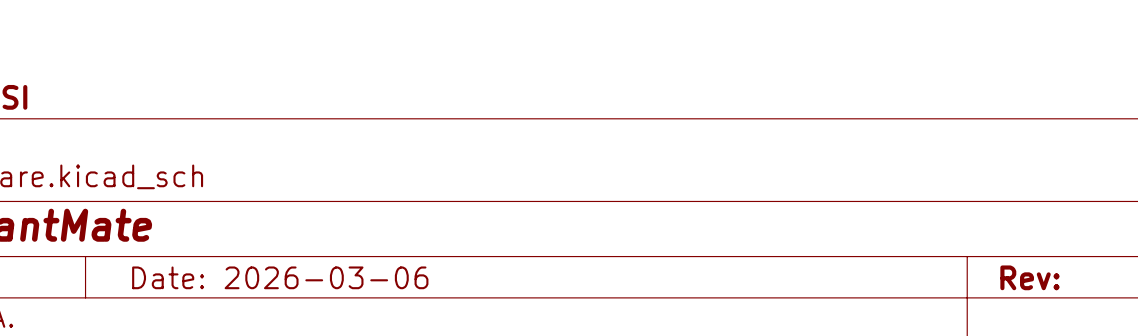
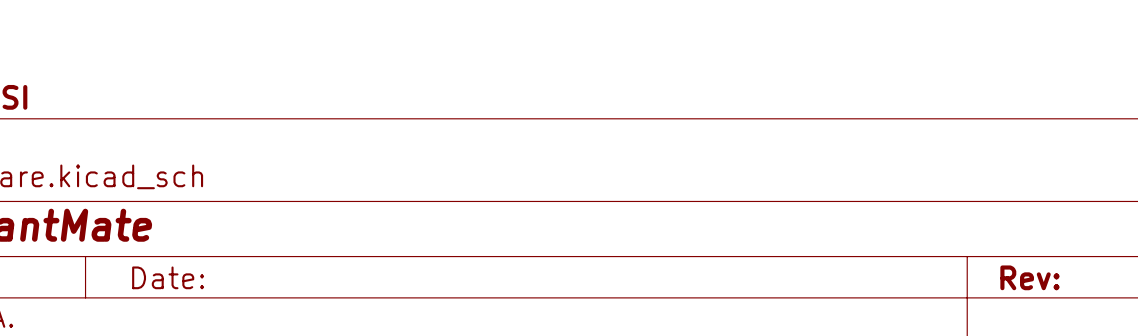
title block: Date: 2026-03-06 (280, 277) -> Date: (168, 277)

